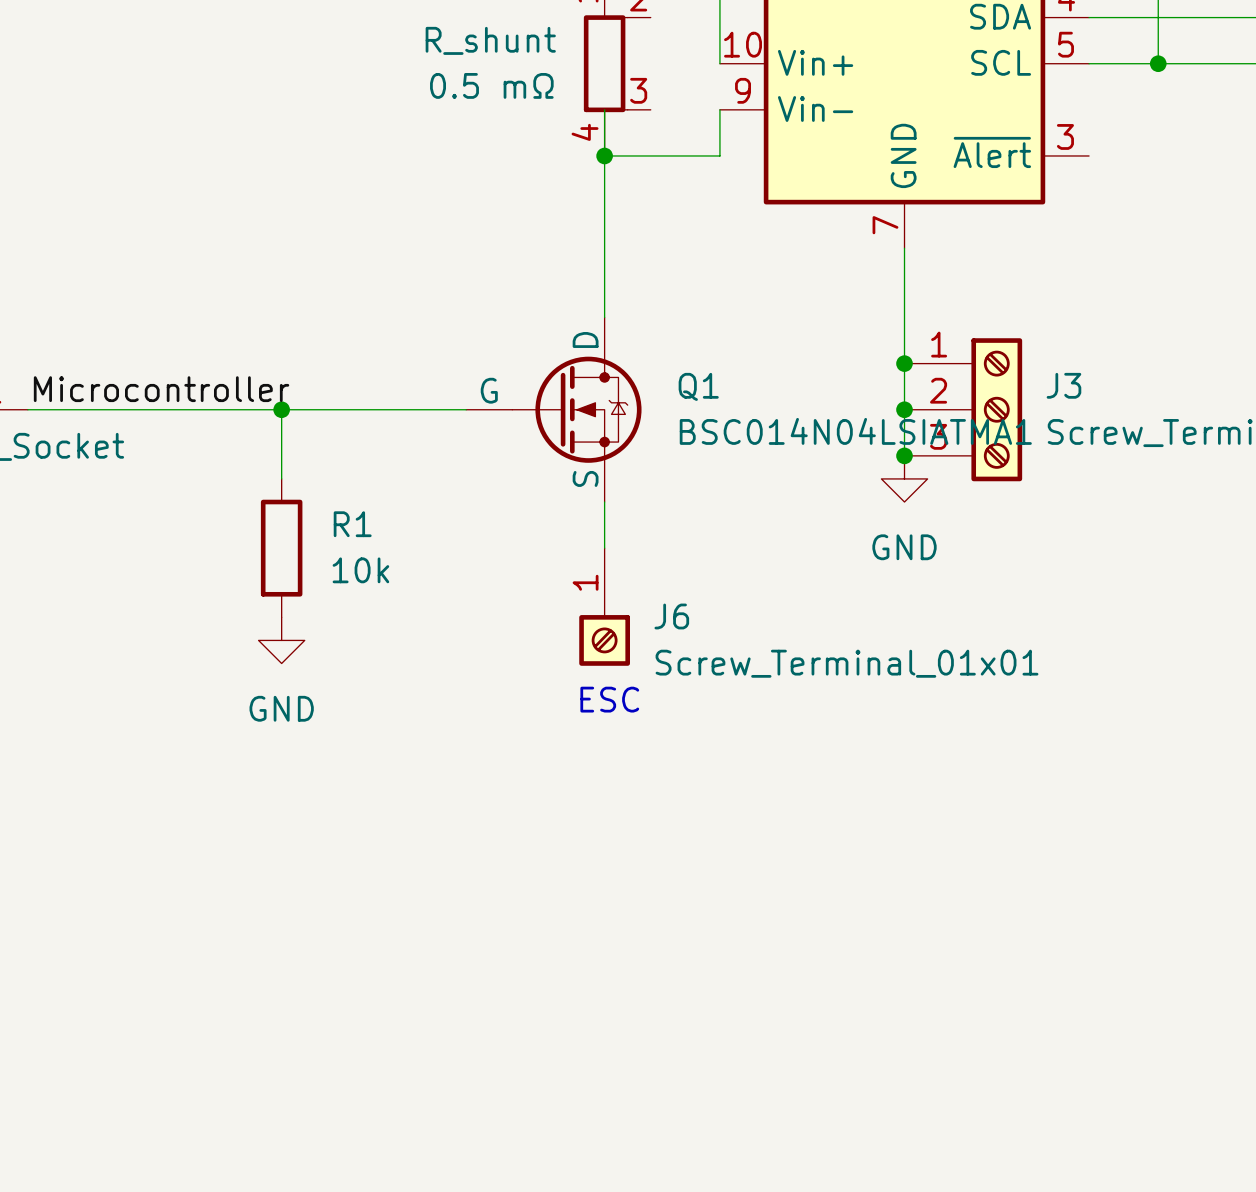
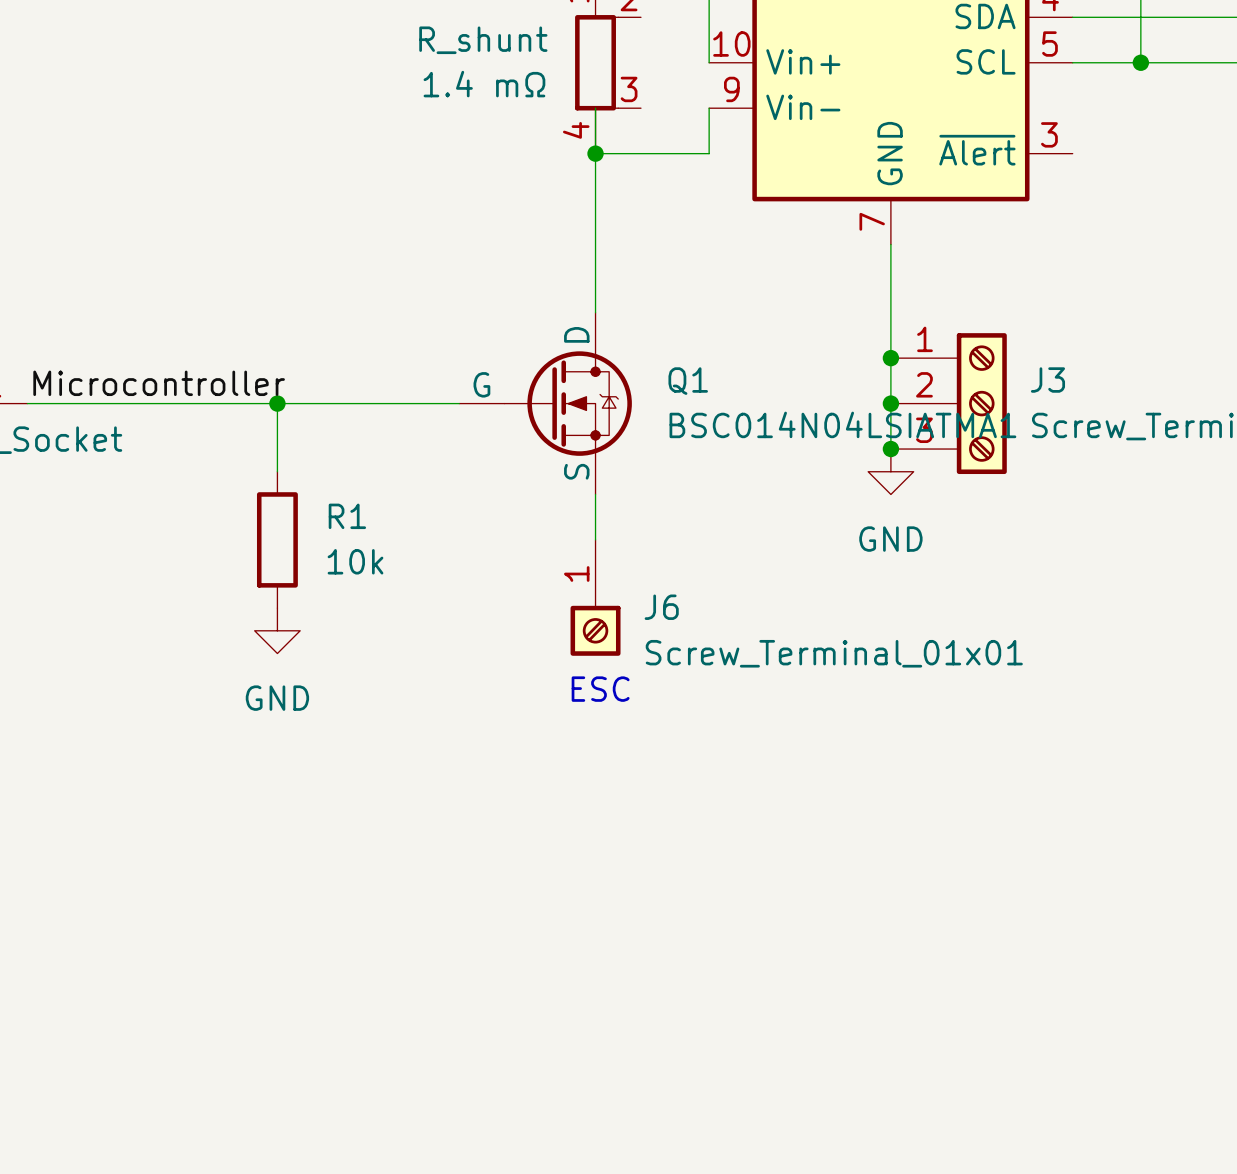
R_shunt value: 0.5 mΩ (491, 85) -> 1.4 mΩ (484, 84)

